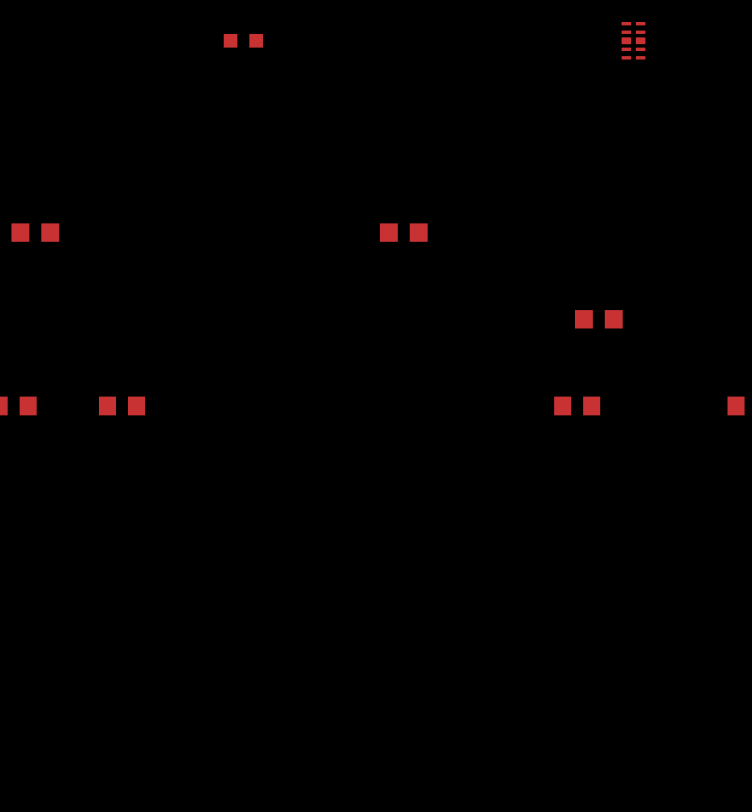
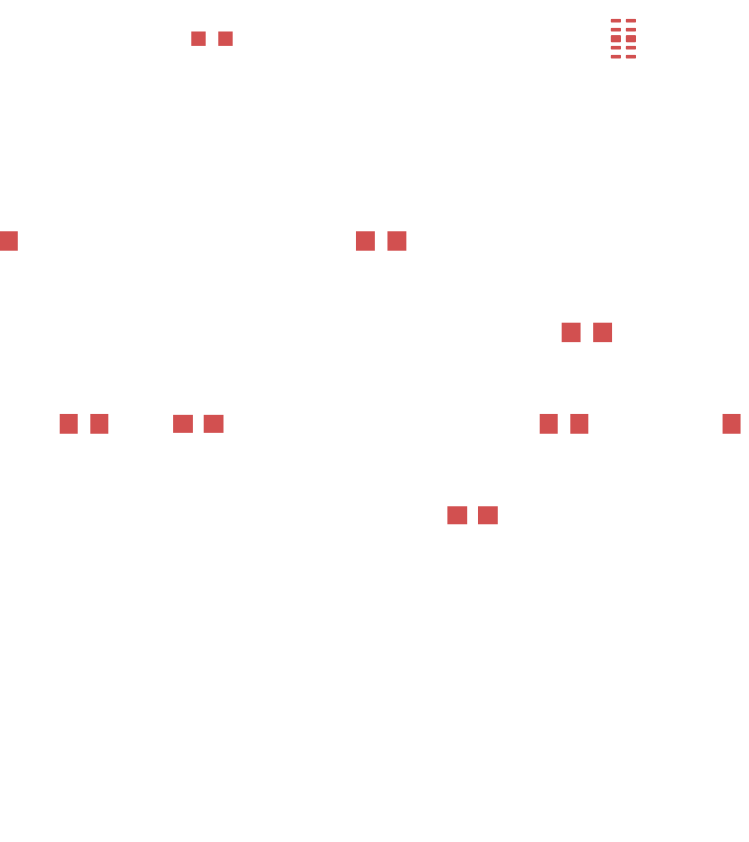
part: none -> (198, 423)
part: none -> (472, 515)

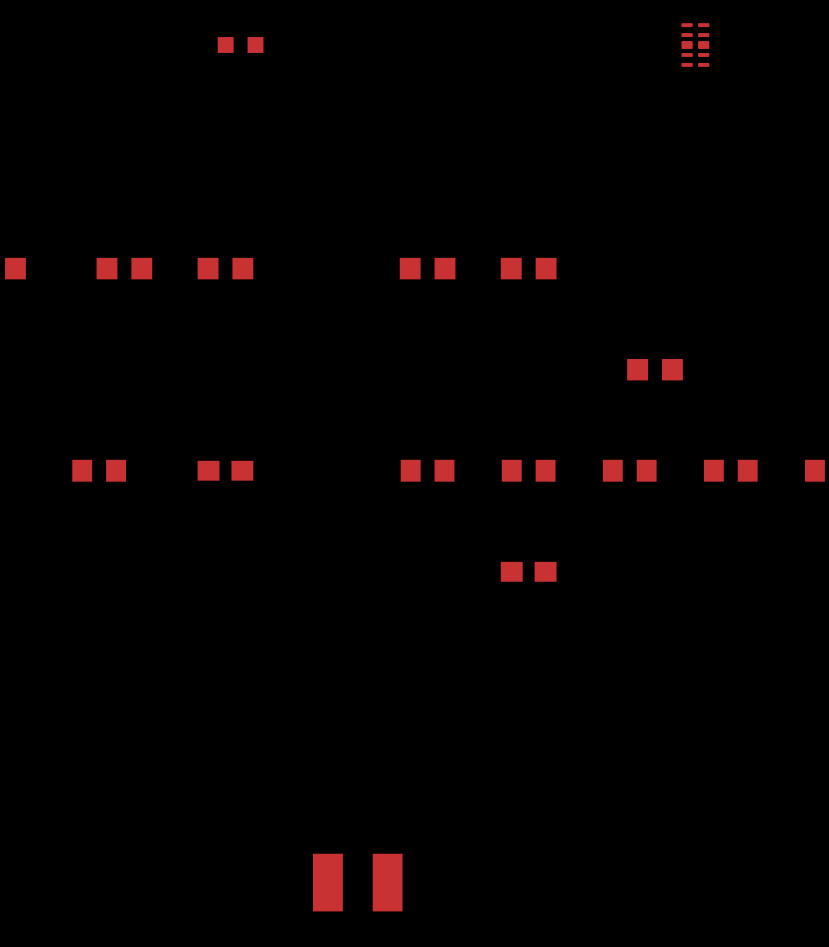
part: none -> (124, 268)
part: none -> (225, 268)
part: none -> (528, 268)
part: none -> (427, 470)
part: none -> (528, 470)
part: none -> (730, 470)
part: none -> (357, 882)

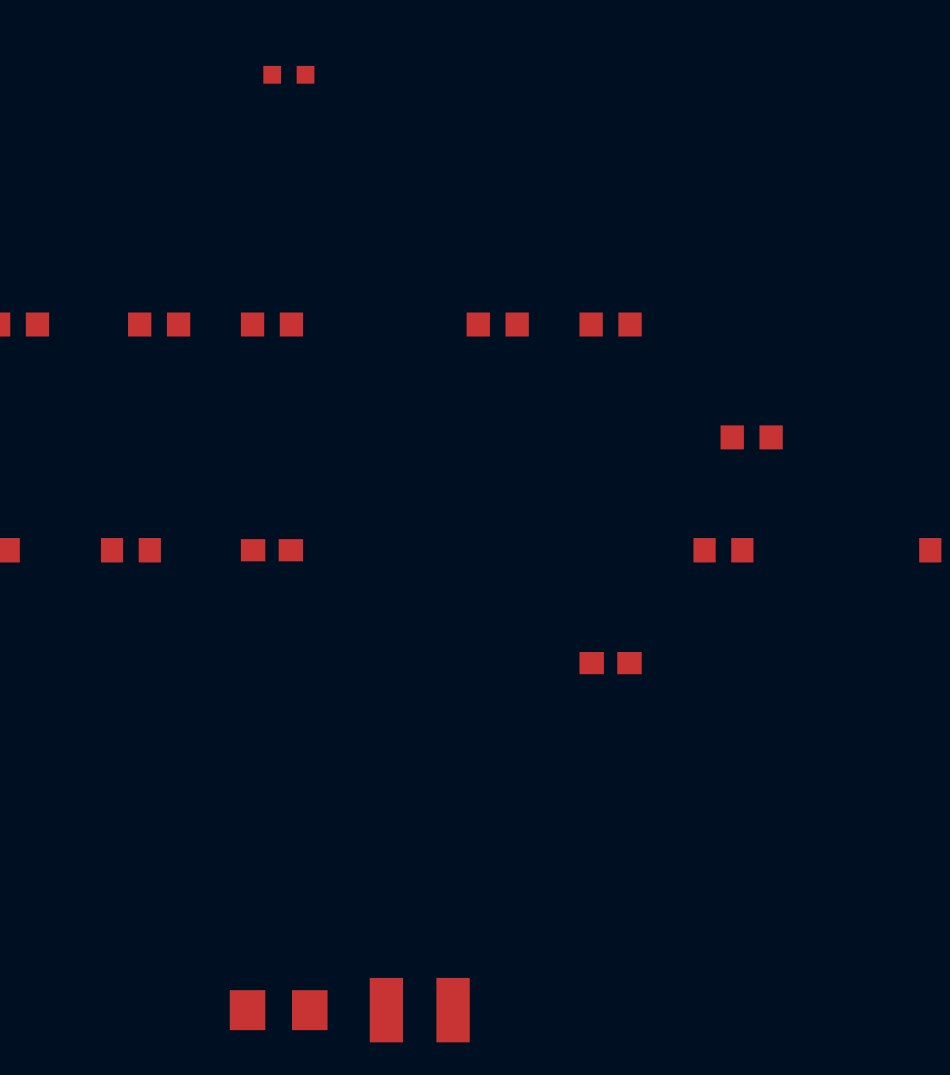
part: (695, 45) -> none
part: (427, 470) -> none
part: (528, 470) -> none
part: (730, 470) -> none
part: none -> (278, 1010)

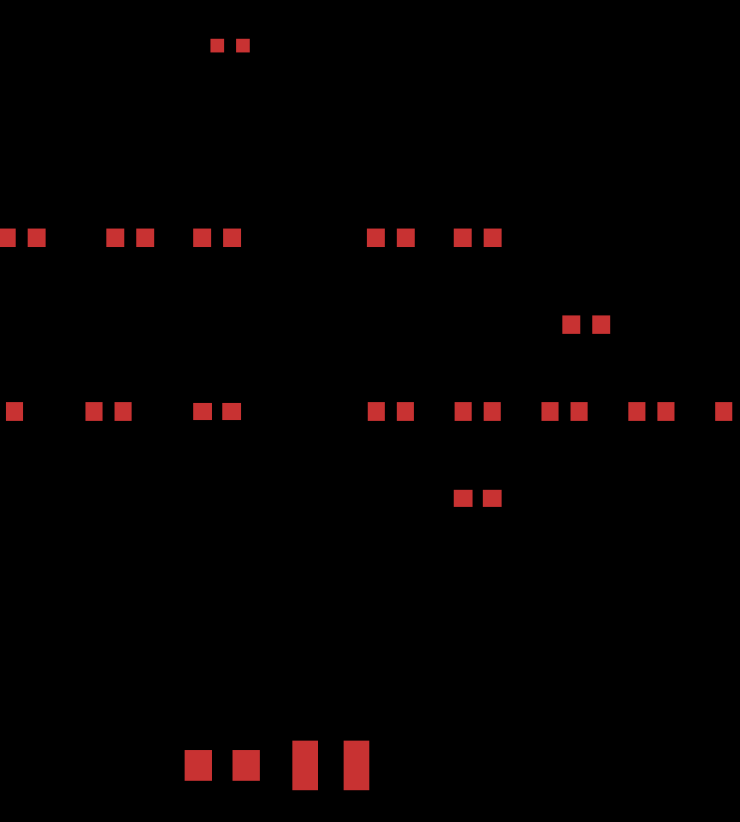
part: none -> (390, 411)
part: none -> (477, 411)
part: none -> (651, 411)

